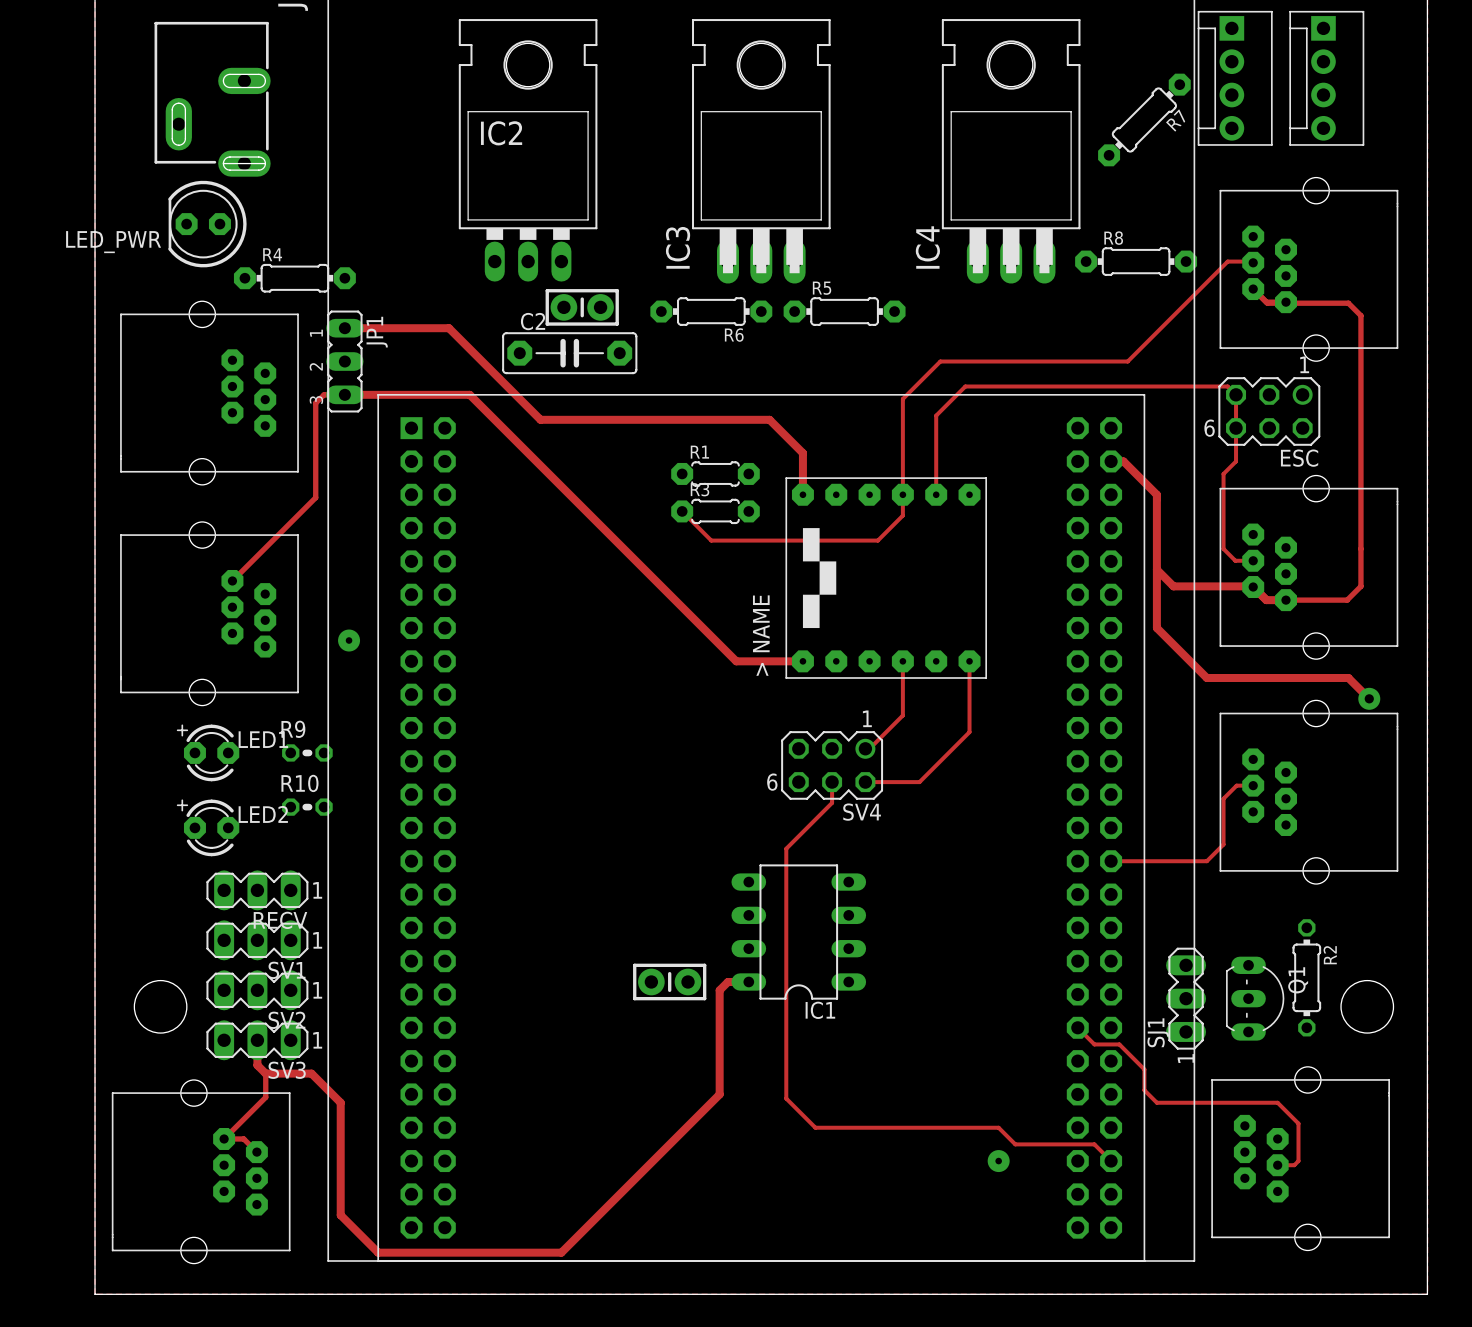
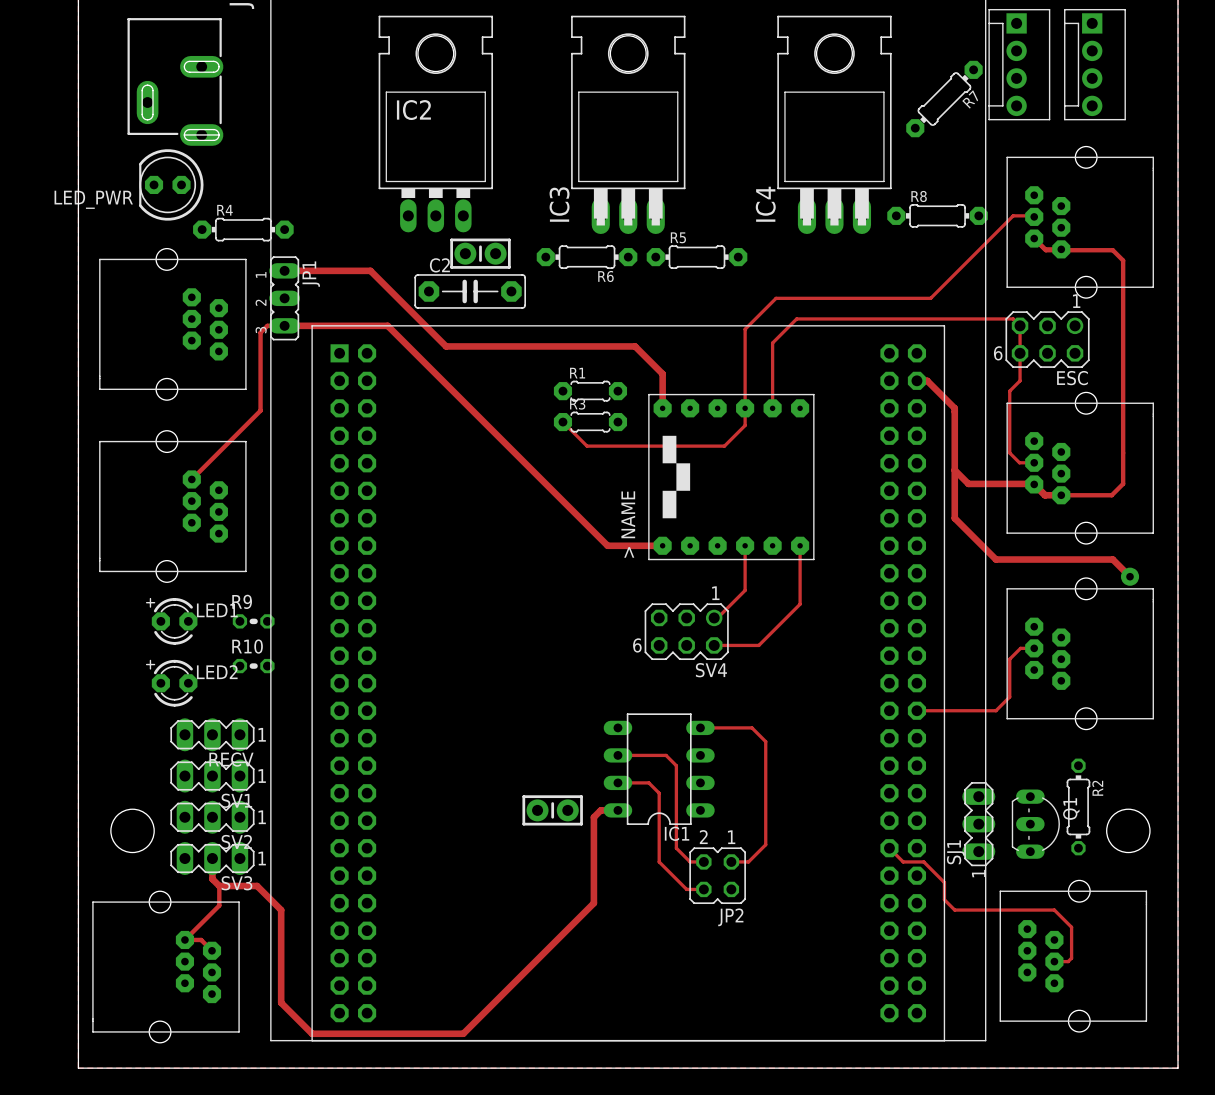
via: (349, 640) -> none
track: (832, 782) (832, 802) (786, 848) (786, 1098) (815, 1127) (998, 1127) (1015, 1144) (1094, 1144) (1111, 1161) -> none
track: none -> (700, 727) (751, 727) (765, 741) (765, 844) (748, 861) (731, 861)
track: none -> (617, 755) (666, 755) (676, 765) (676, 848) (690, 861) (703, 861)
track: none -> (617, 782) (648, 782) (659, 793) (659, 861) (686, 889) (703, 889)
JP2: none -> (717, 875)
via: (998, 1161) -> none

